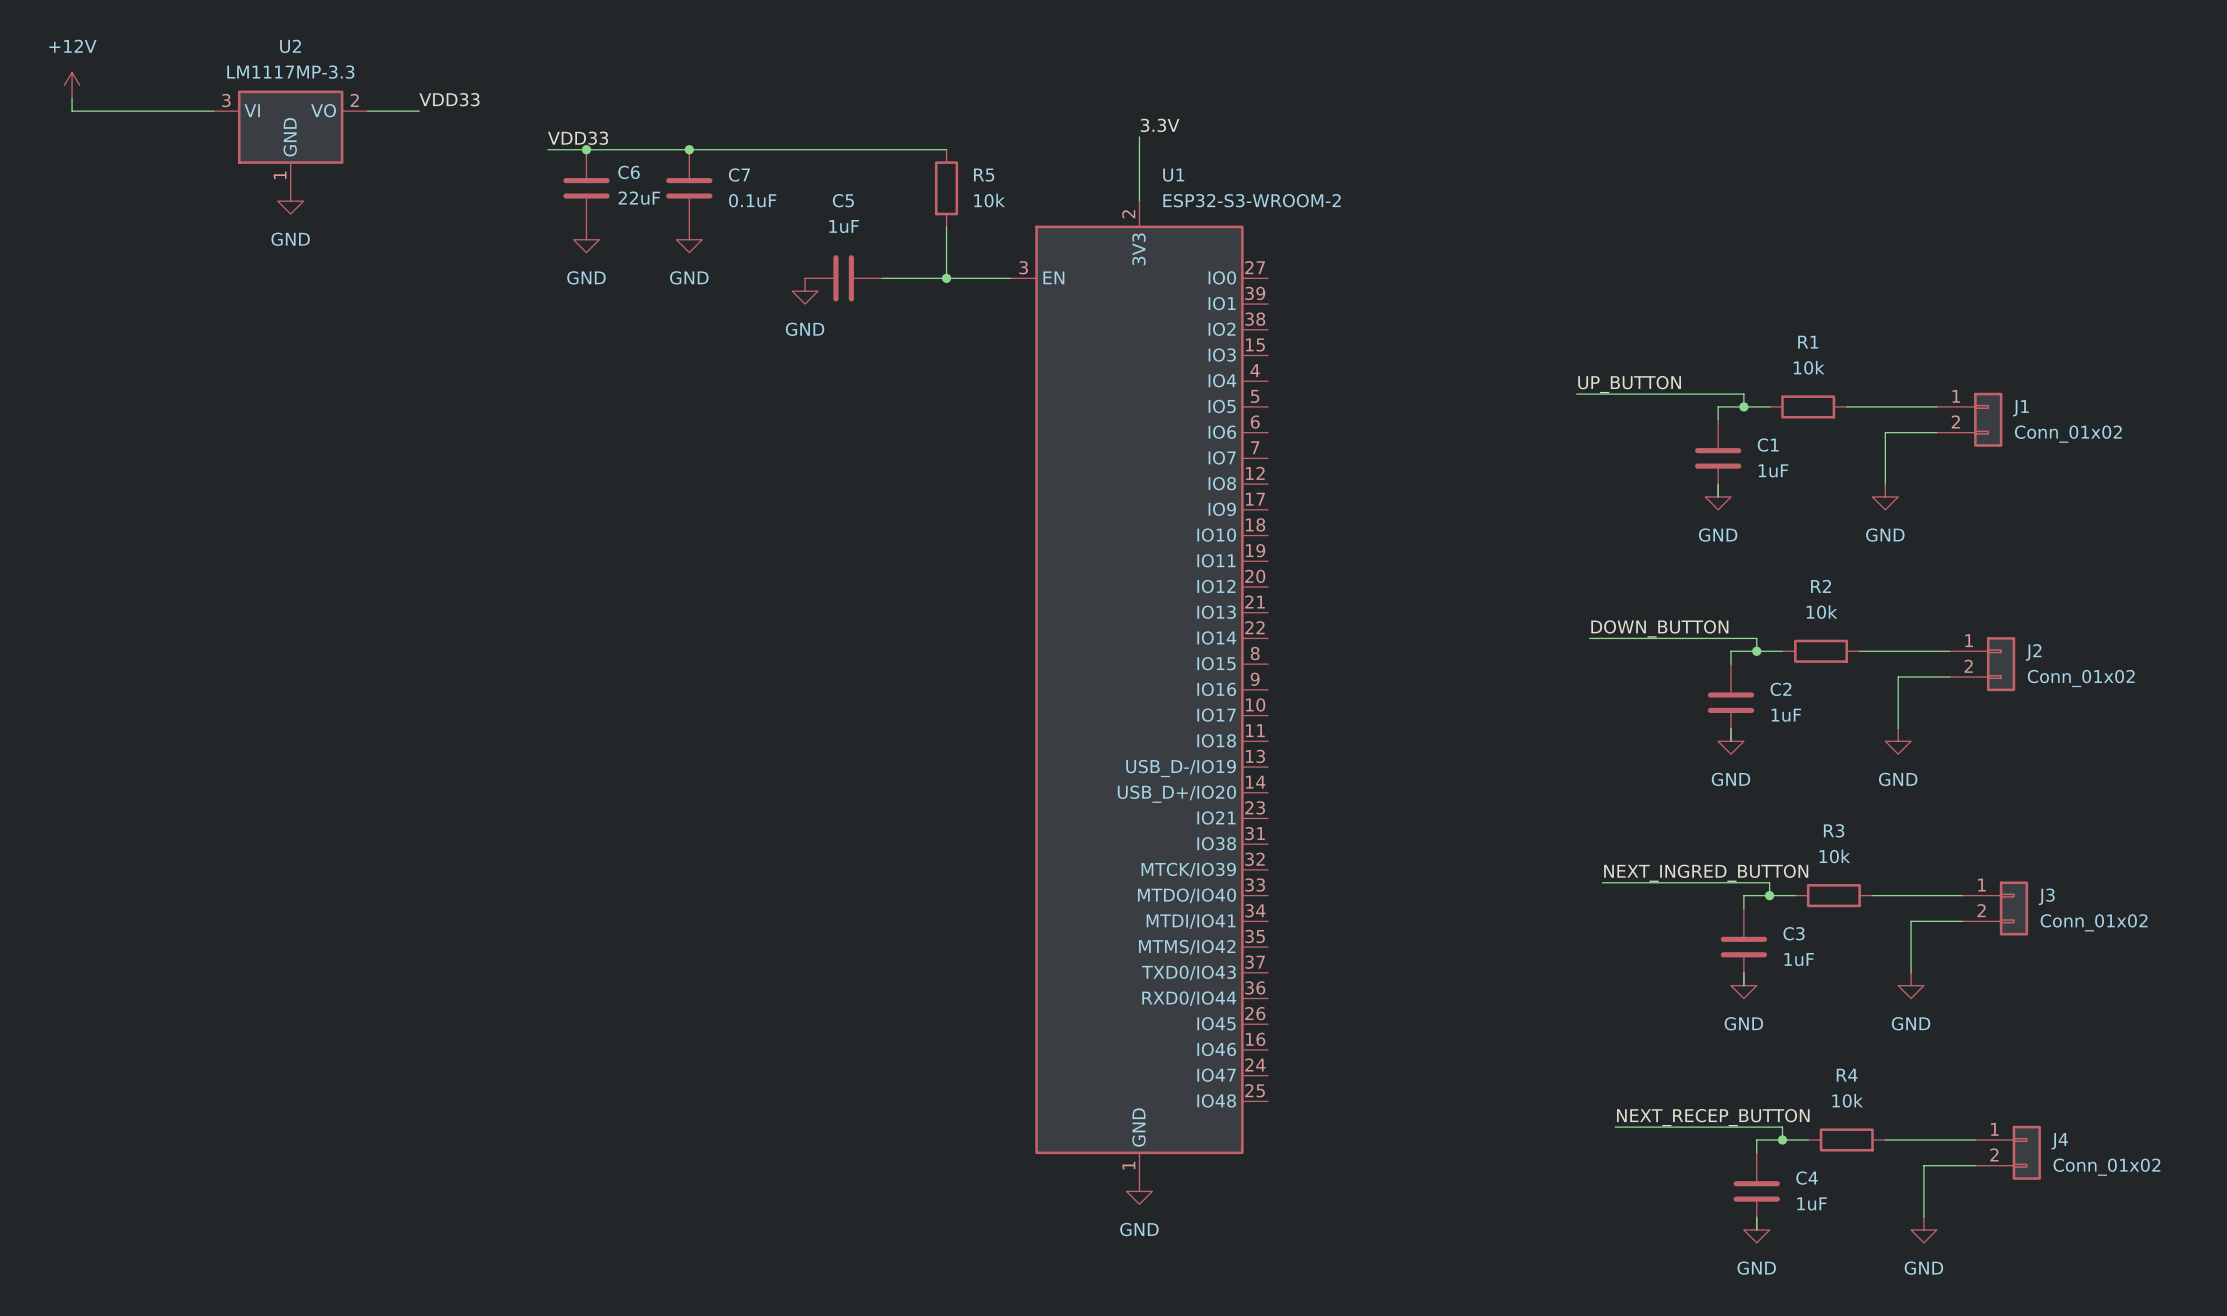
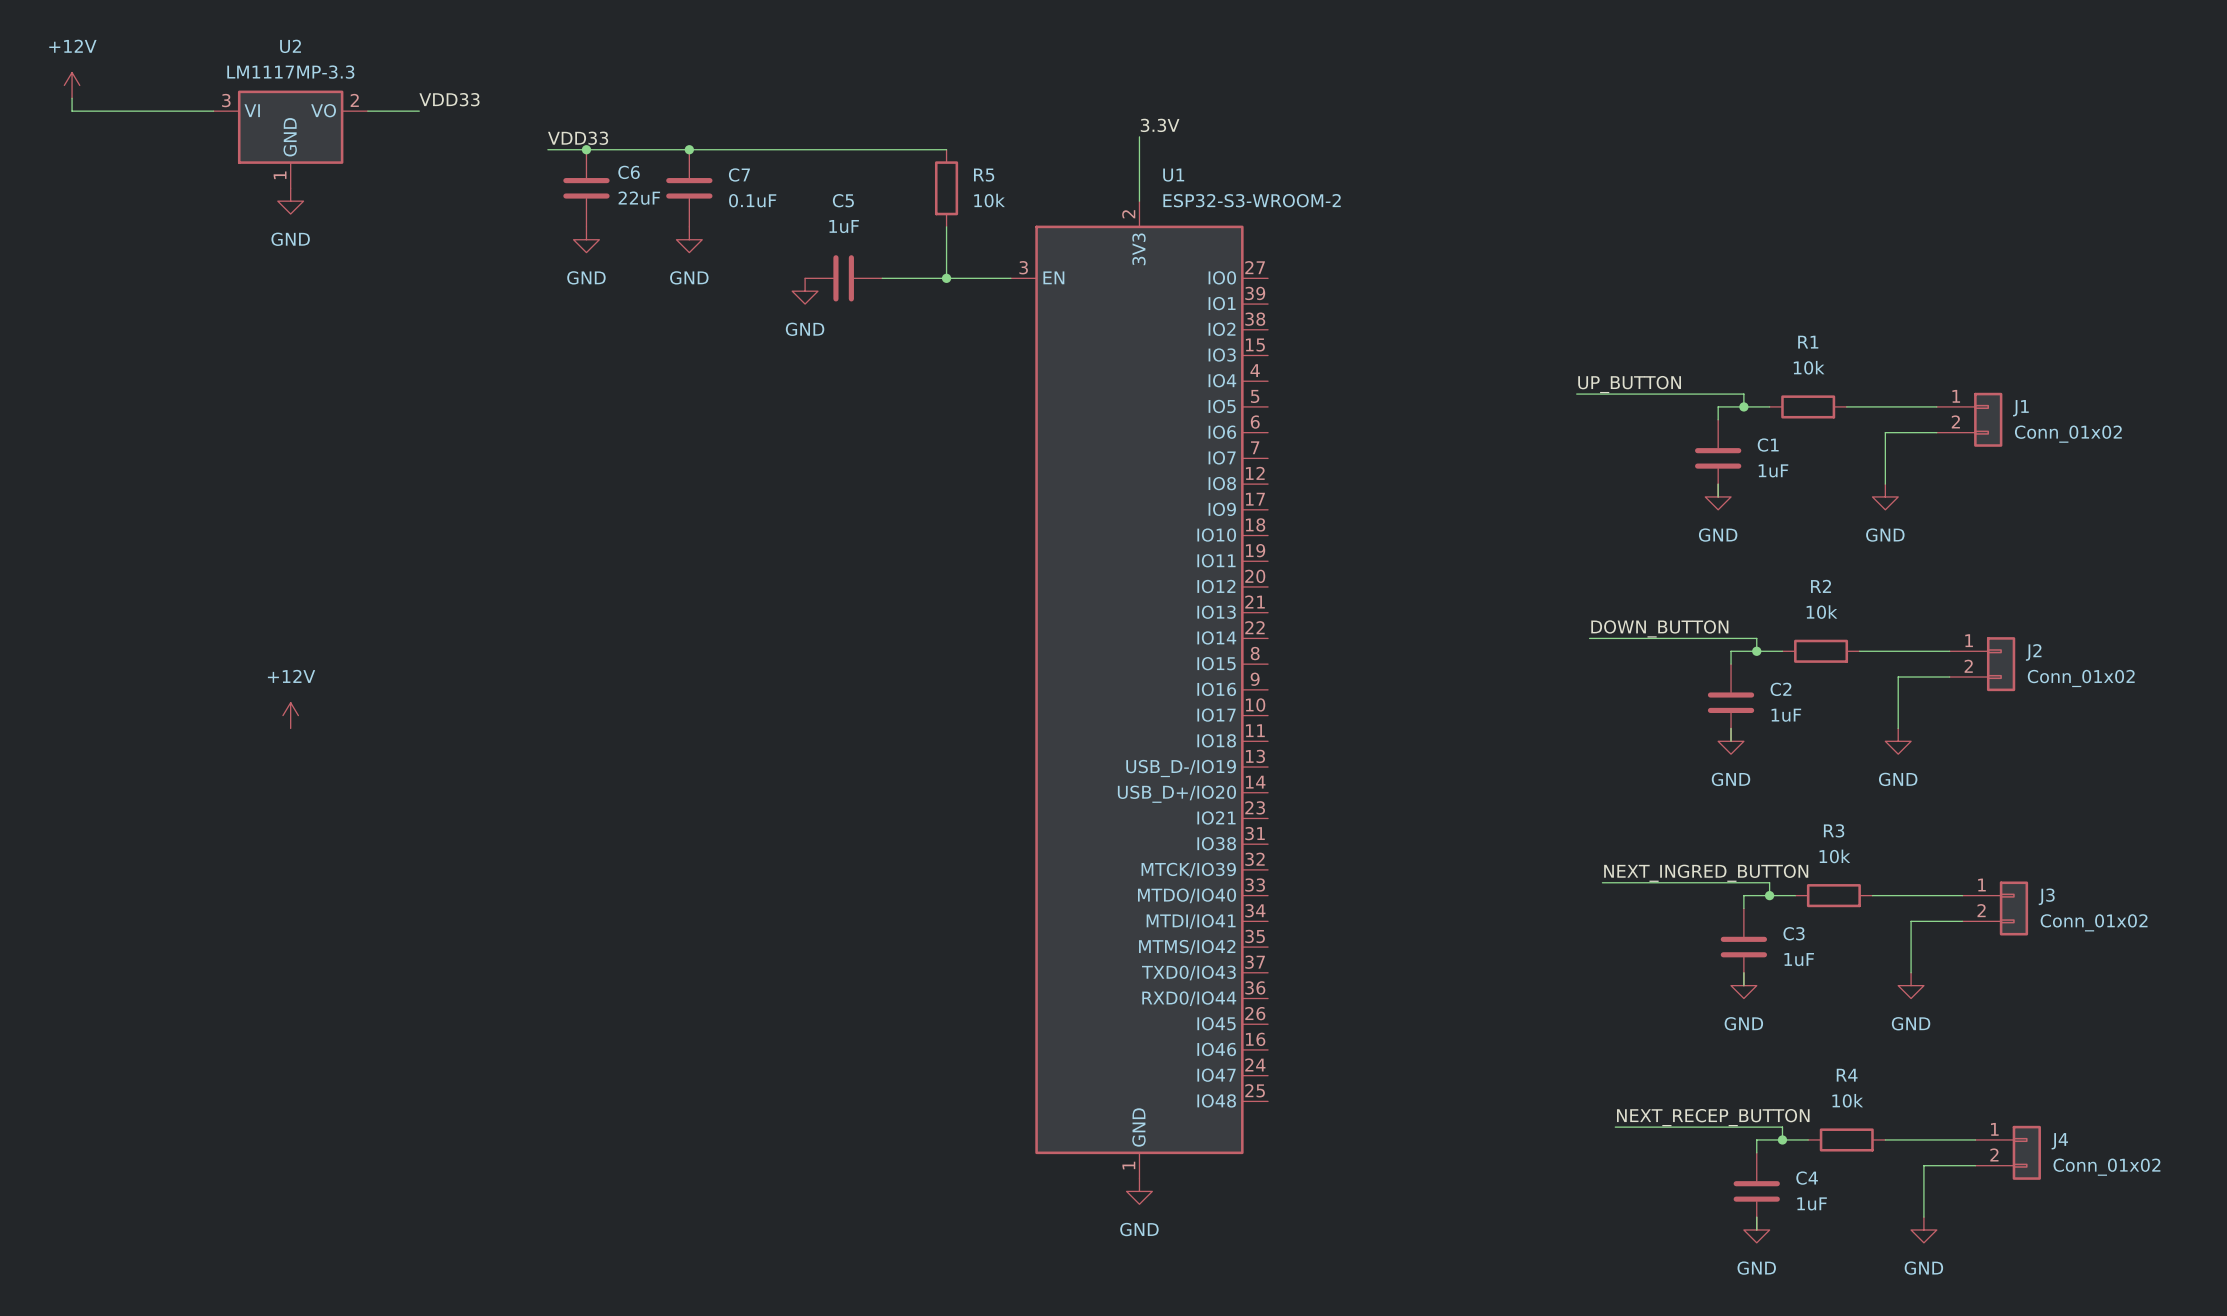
power symbol: none -> +12V (290, 715)

